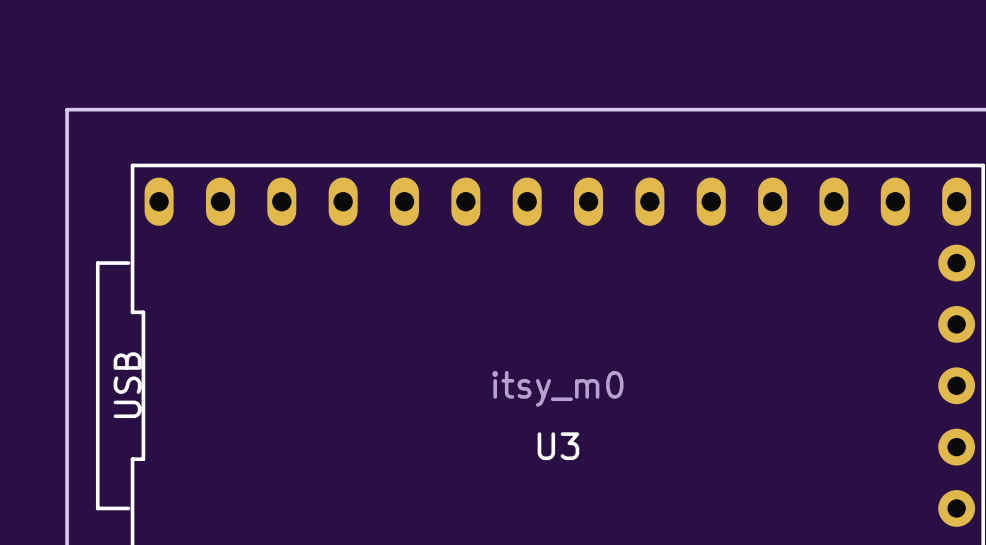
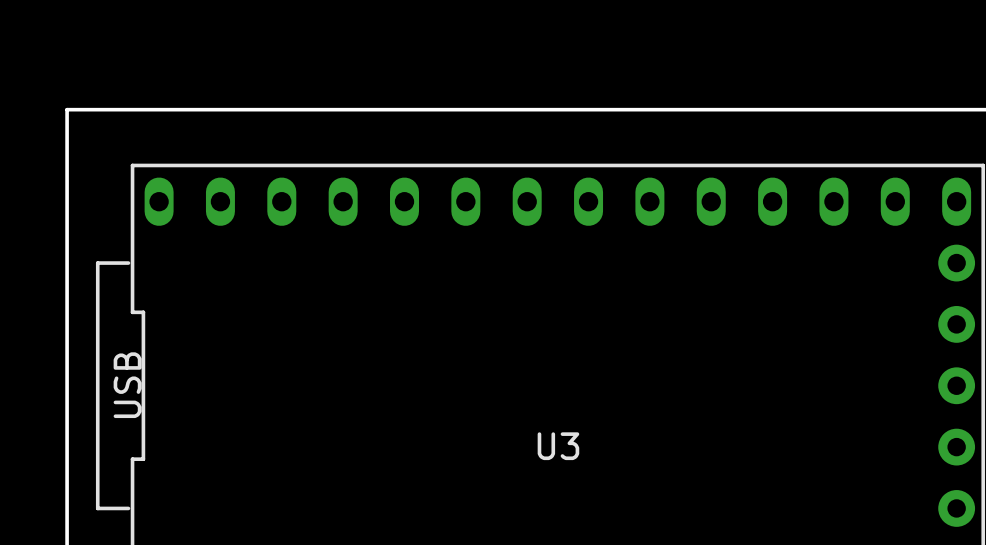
U3 value: itsy_m0 (557, 388) -> none

